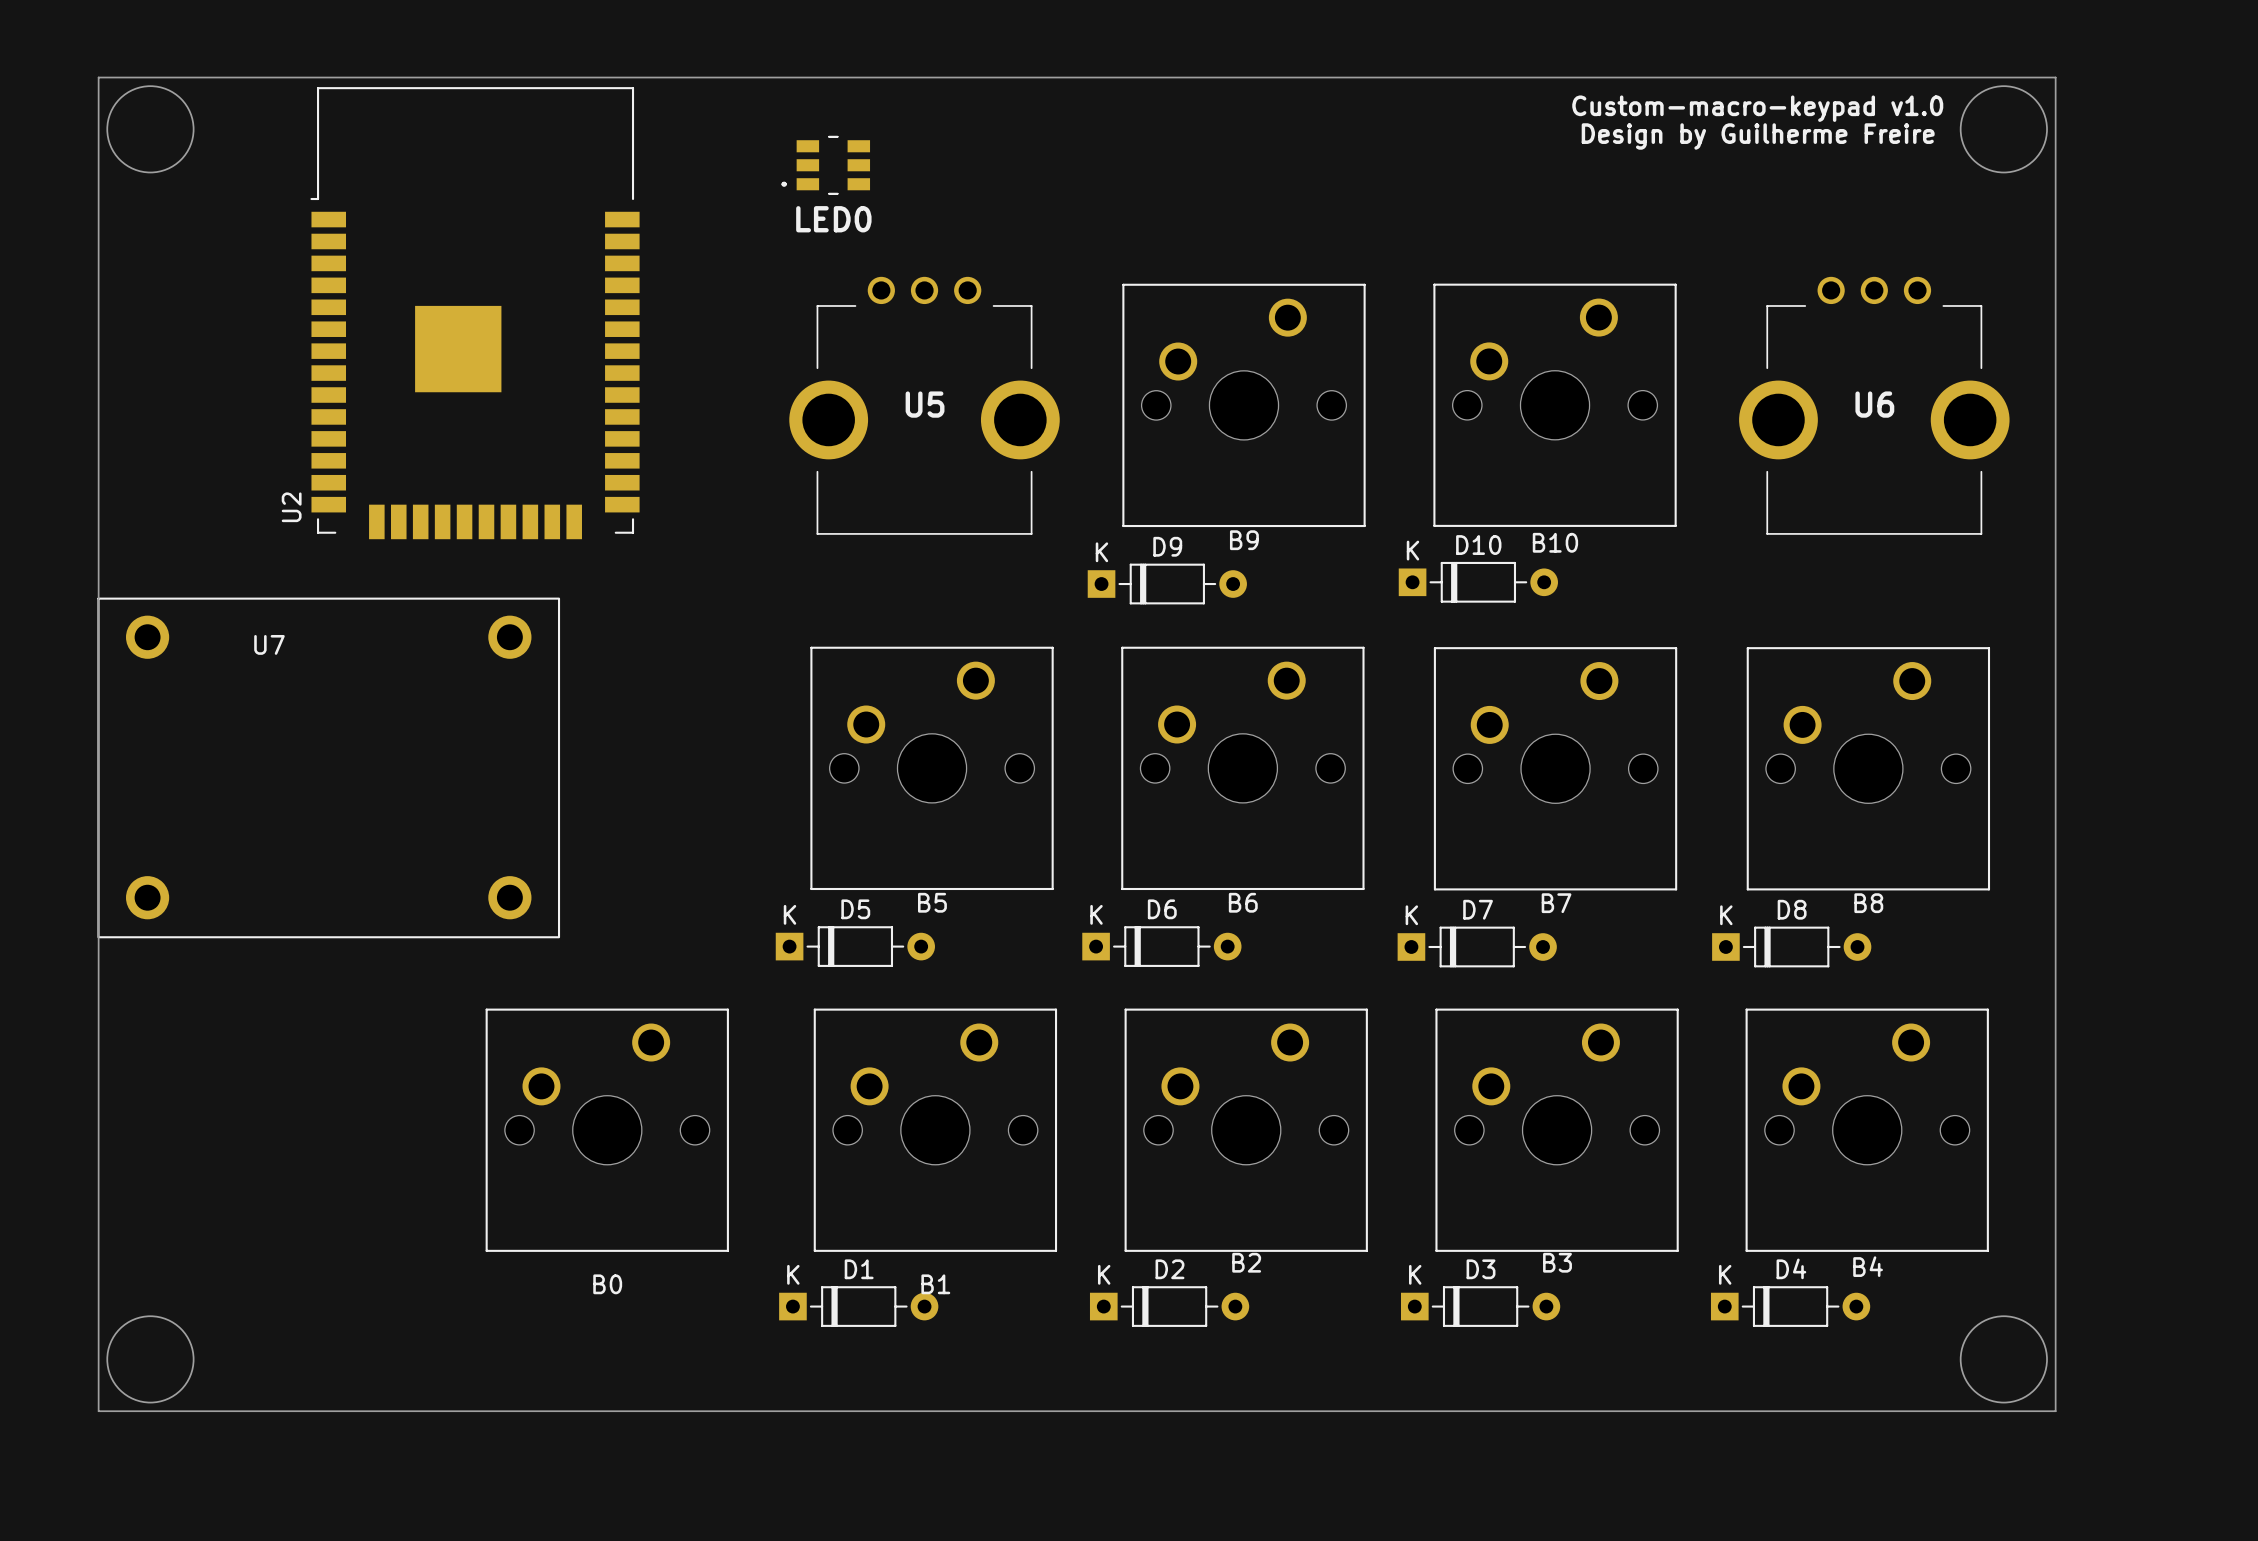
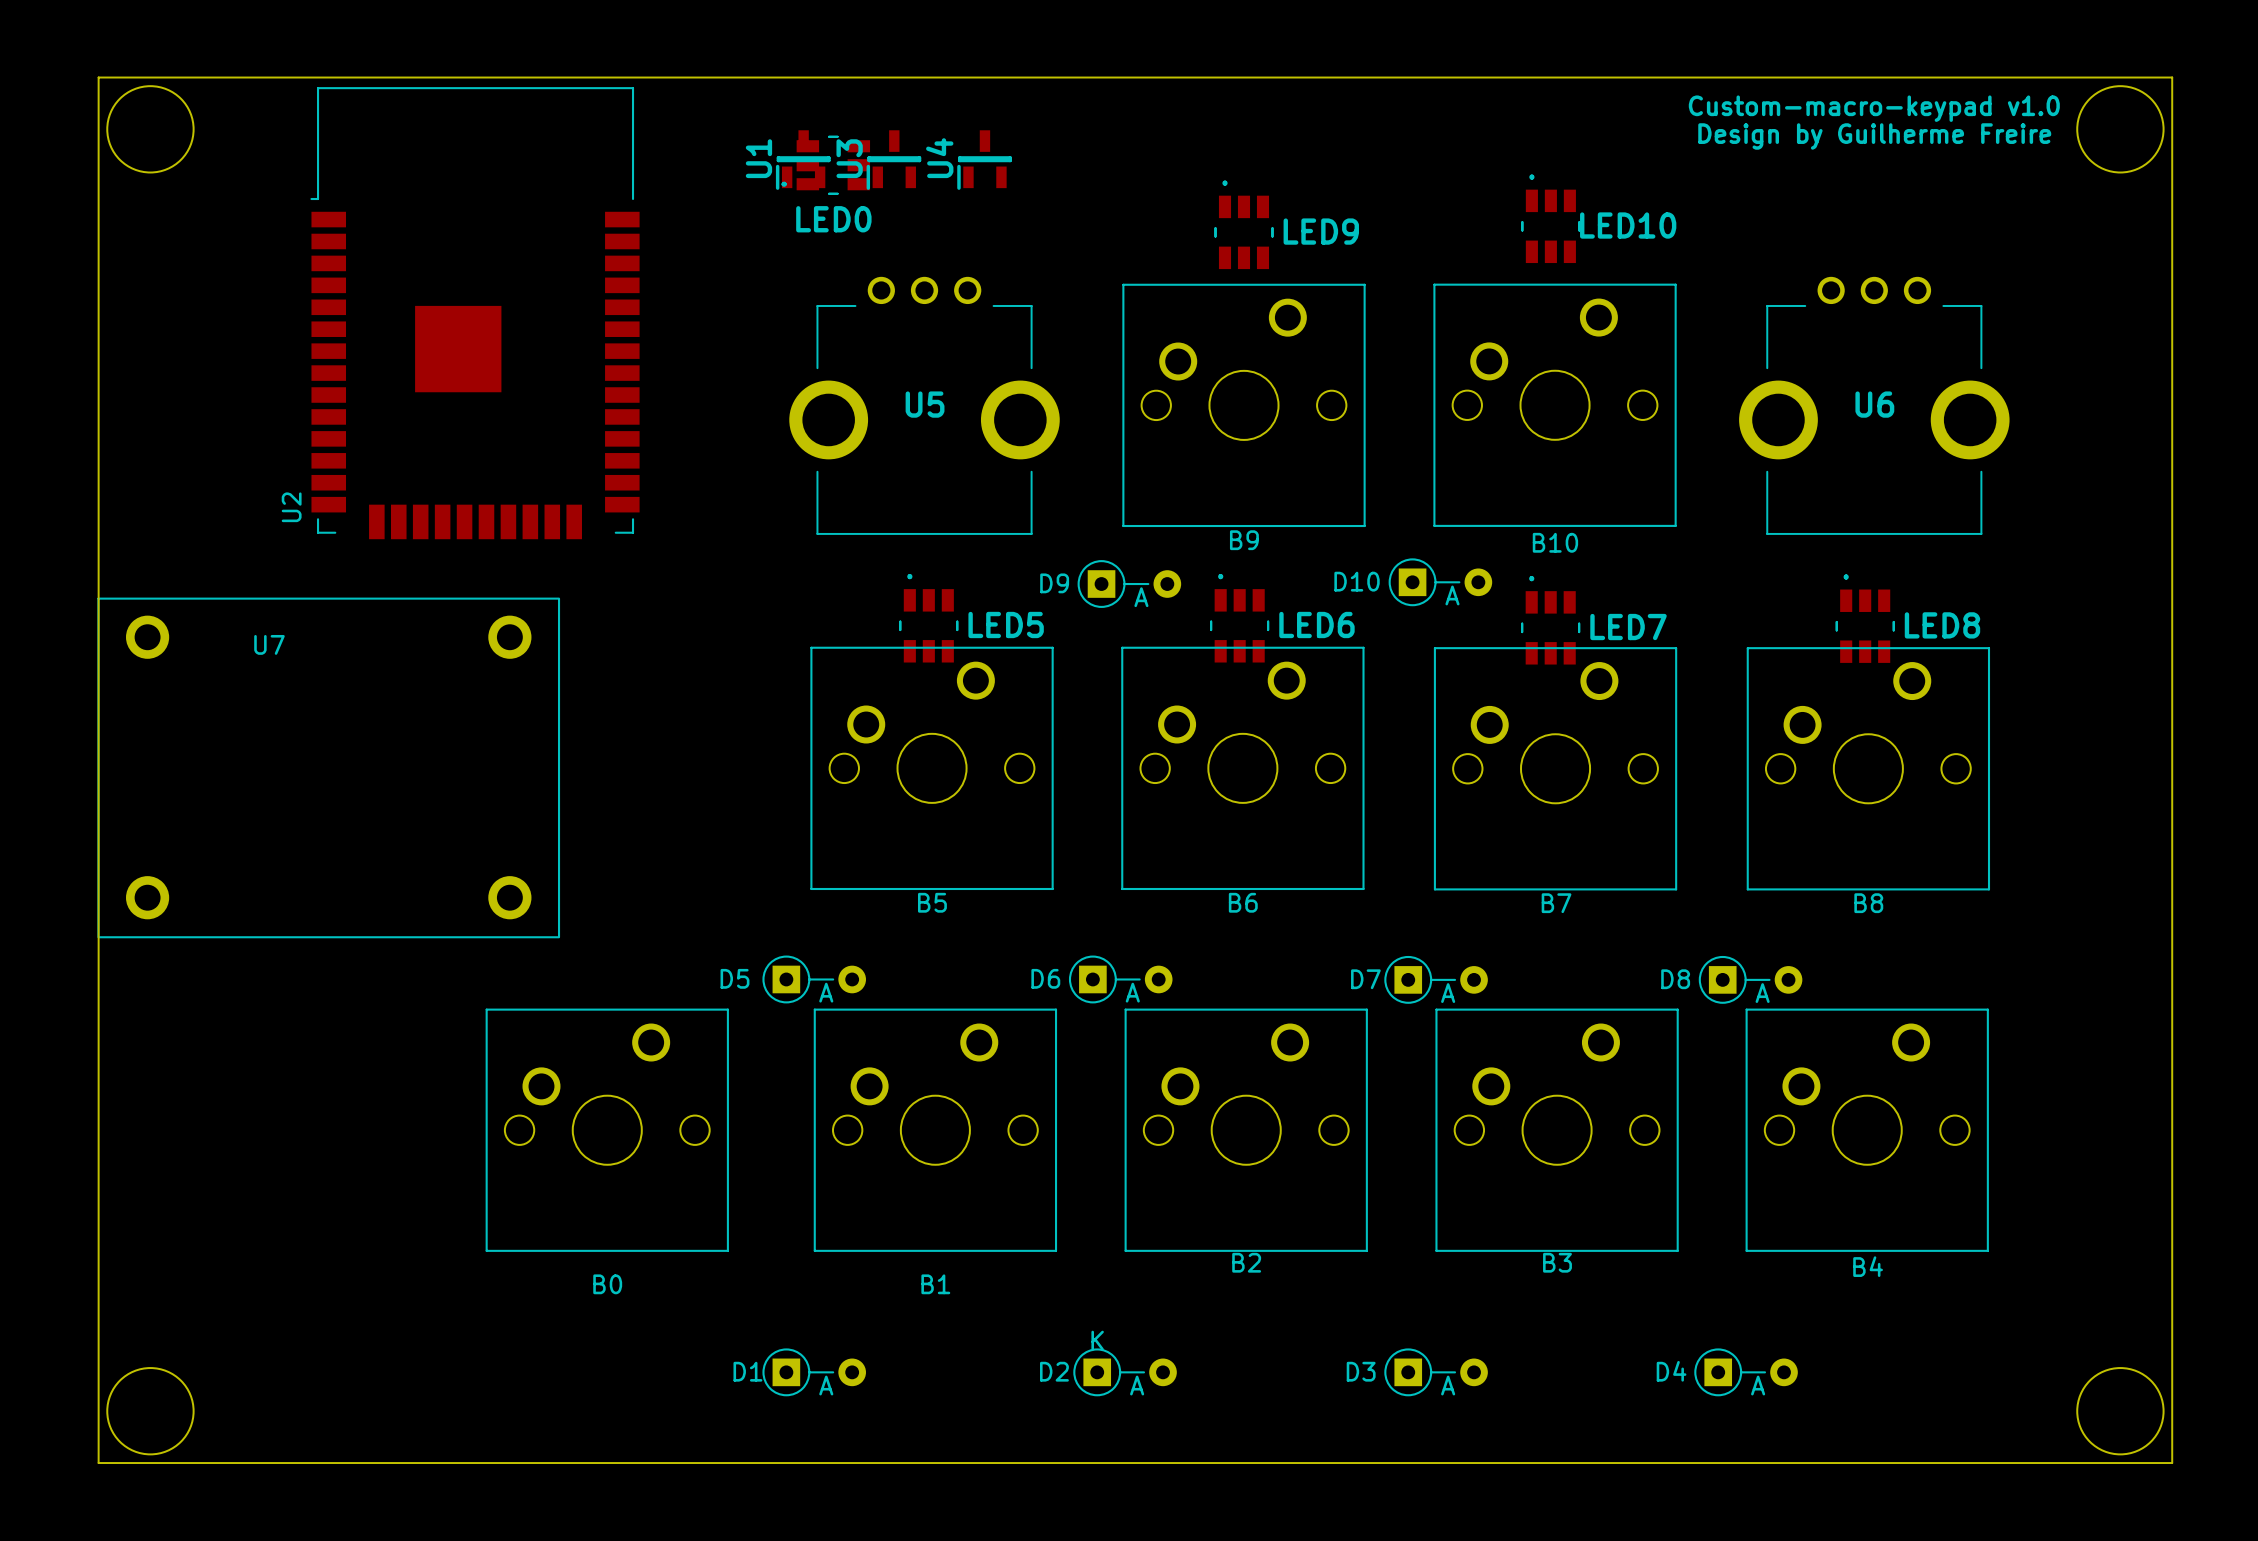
board edge: (2055, 77) (2055, 1411) (98, 1411) -> (2055, 77) (2172, 77) (2172, 1463) (98, 1463) (98, 1411)
text position: Custom-macro-keypad v1.0 (1757, 108) -> Custom-macro-keypad v1.0 (1874, 108)
round board edge position: (2003, 129) -> (2120, 129)
text position: Design by Guilherme Freire (1758, 136) -> Design by Guilherme Freire (1874, 136)
U1: none -> (803, 160)
U3: none -> (893, 160)
U4: none -> (984, 160)
LED10: none -> (1550, 218)
LED9: none -> (1244, 224)
D10 name position: D10 (1478, 545) -> D10 (1357, 581)
D9 name position: D9 (1167, 546) -> D9 (1054, 583)
D10 footprint: [1398, 561, 1558, 603] -> [1388, 558, 1493, 607]
D9 footprint: [1087, 563, 1247, 605] -> [1077, 560, 1182, 608]
LED5: none -> (928, 618)
LED6: none -> (1239, 618)
LED8: none -> (1865, 618)
LED7: none -> (1550, 620)
D5 name position: D5 (855, 909) -> D5 (734, 978)
D6 name position: D6 (1162, 909) -> D6 (1045, 978)
D7 name position: D7 (1478, 909) -> D7 (1365, 979)
D8 name position: D8 (1792, 909) -> D8 (1675, 979)
D5 footprint: [775, 926, 935, 967] -> [762, 955, 866, 1004]
D6 footprint: [1082, 926, 1242, 967] -> [1068, 955, 1173, 1004]
D7 footprint: [1397, 926, 1557, 968] -> [1384, 955, 1488, 1004]
D8 footprint: [1712, 926, 1872, 968] -> [1698, 955, 1803, 1004]
D4 name position: D4 (1791, 1268) -> D4 (1671, 1371)
D1 name position: D1 (859, 1269) -> D1 (747, 1371)
D2 name position: D2 (1169, 1269) -> D2 (1054, 1371)
D3 name position: D3 (1481, 1269) -> D3 (1361, 1371)
D1 footprint: [779, 1286, 939, 1327] -> [762, 1348, 866, 1397]
D2 footprint: [1089, 1286, 1250, 1327] -> [1073, 1348, 1177, 1397]
D3 footprint: [1400, 1286, 1561, 1327] -> [1384, 1348, 1488, 1397]
D4 footprint: [1710, 1286, 1871, 1327] -> [1694, 1348, 1798, 1397]
round board edge position: (150, 1359) -> (150, 1411)
round board edge position: (2003, 1359) -> (2120, 1411)

